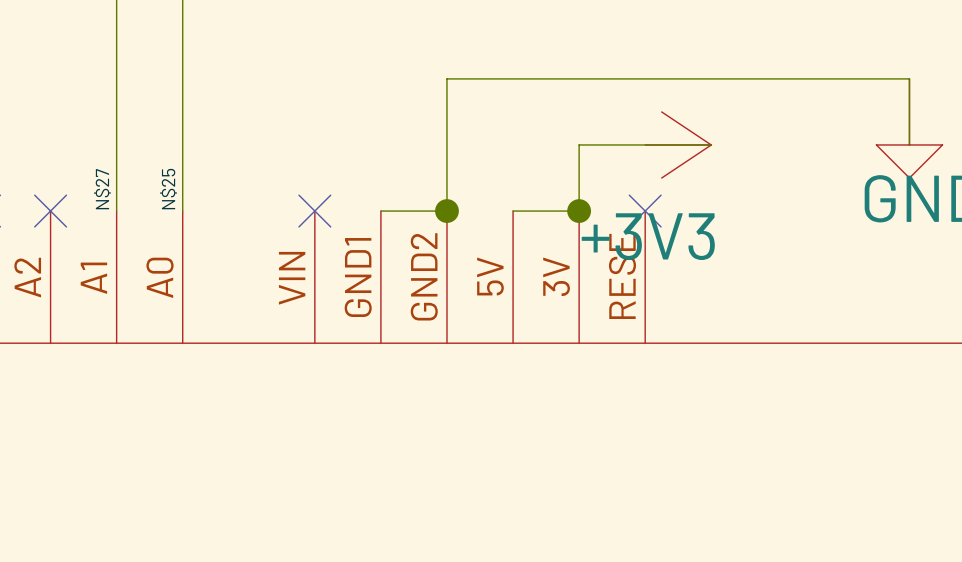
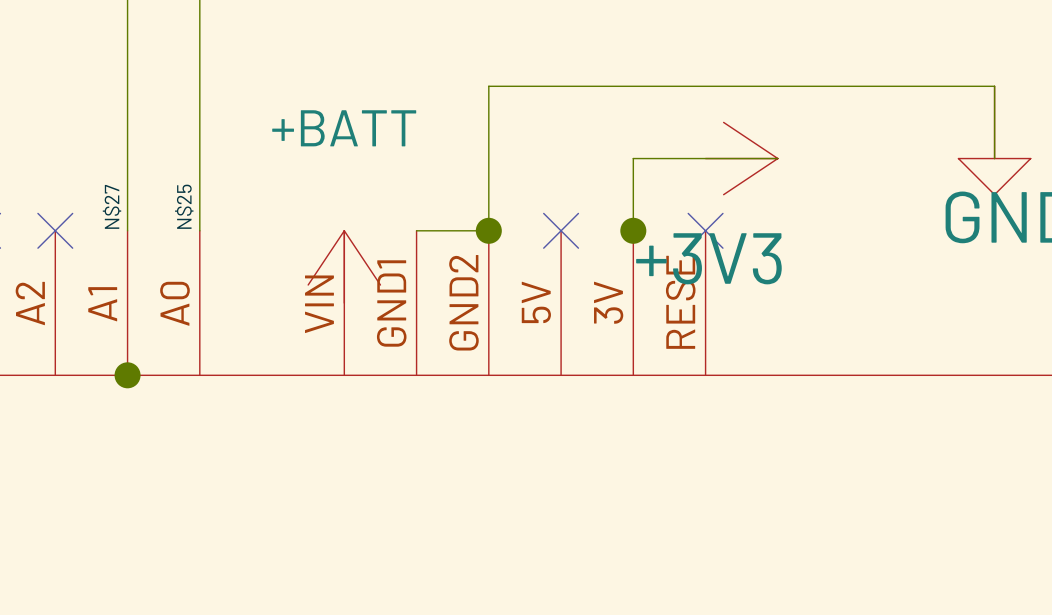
no-connect mark: (314, 211) -> none
wire: (513, 211) (579, 211) -> none
no-connect mark: none -> (561, 230)
power symbol: none -> +BATT (344, 266)
junction: none -> (127, 375)

